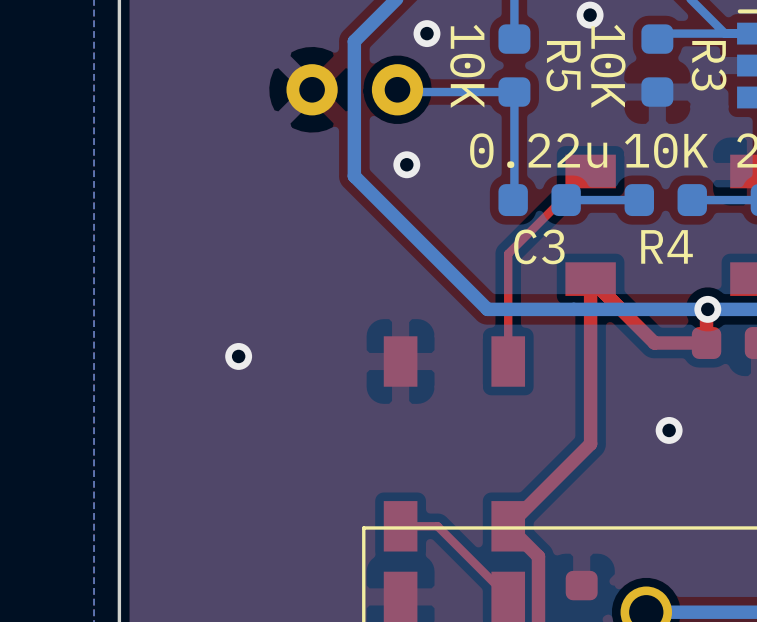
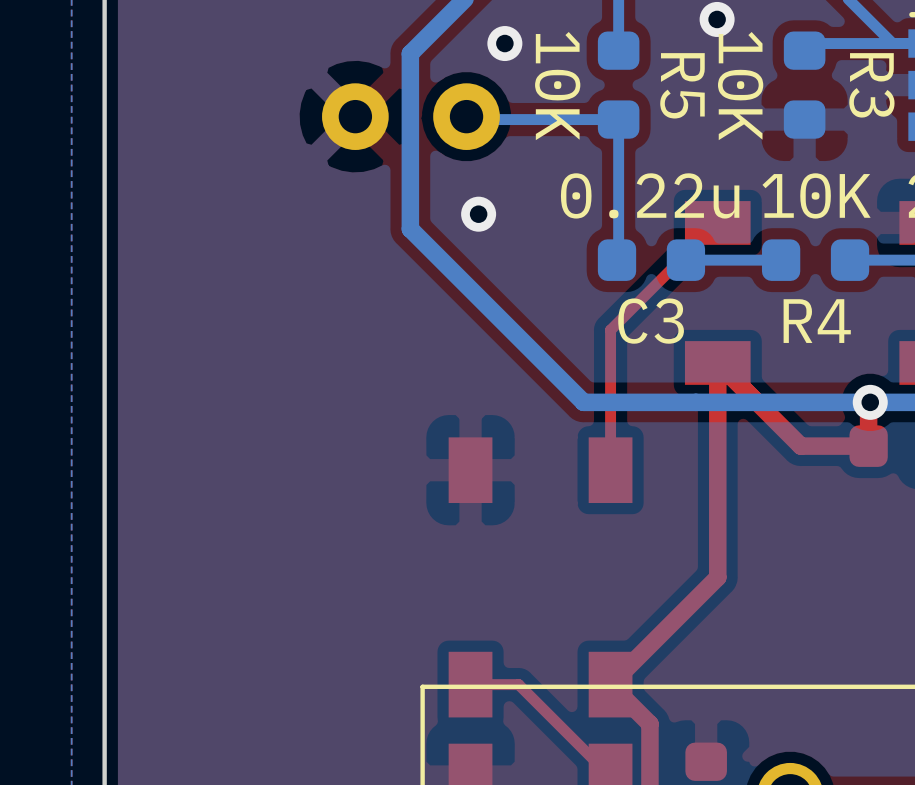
via: (238, 356) -> none
via: (669, 430) -> none

